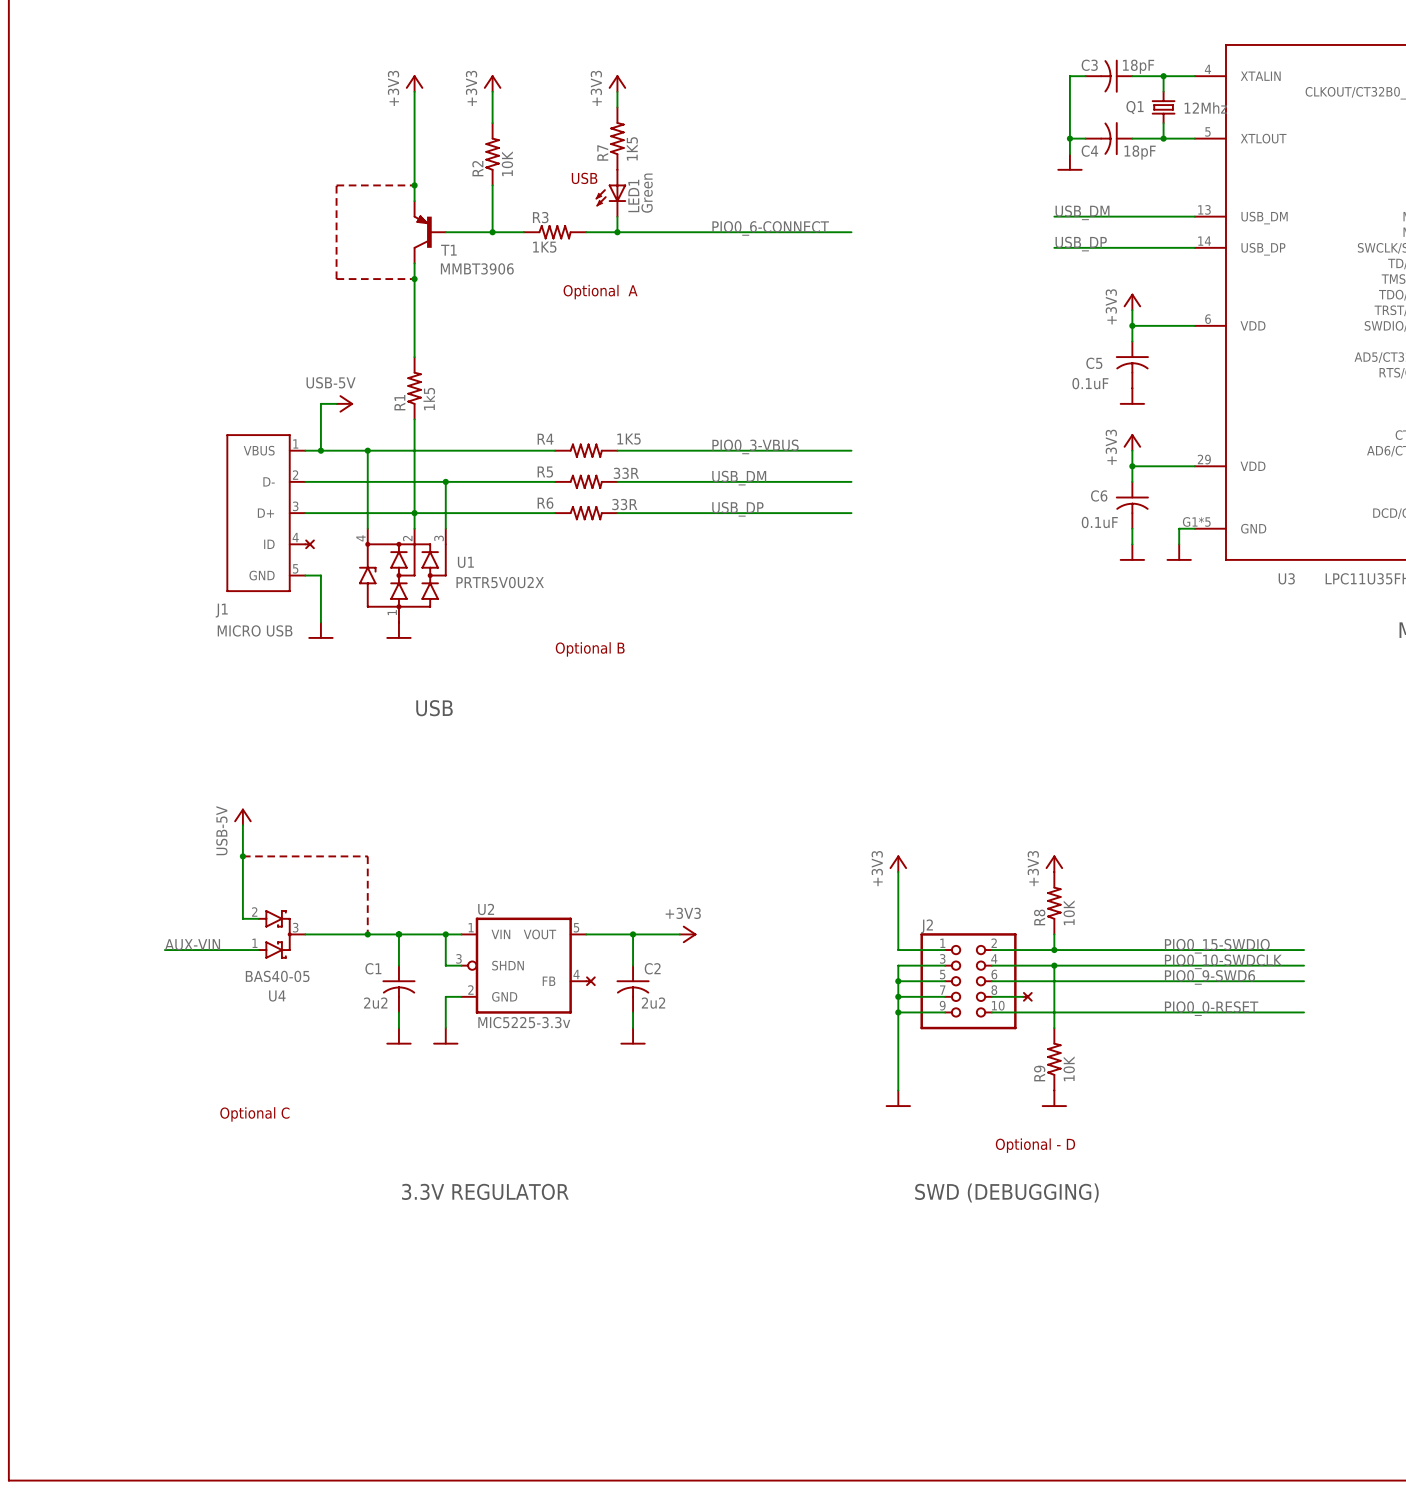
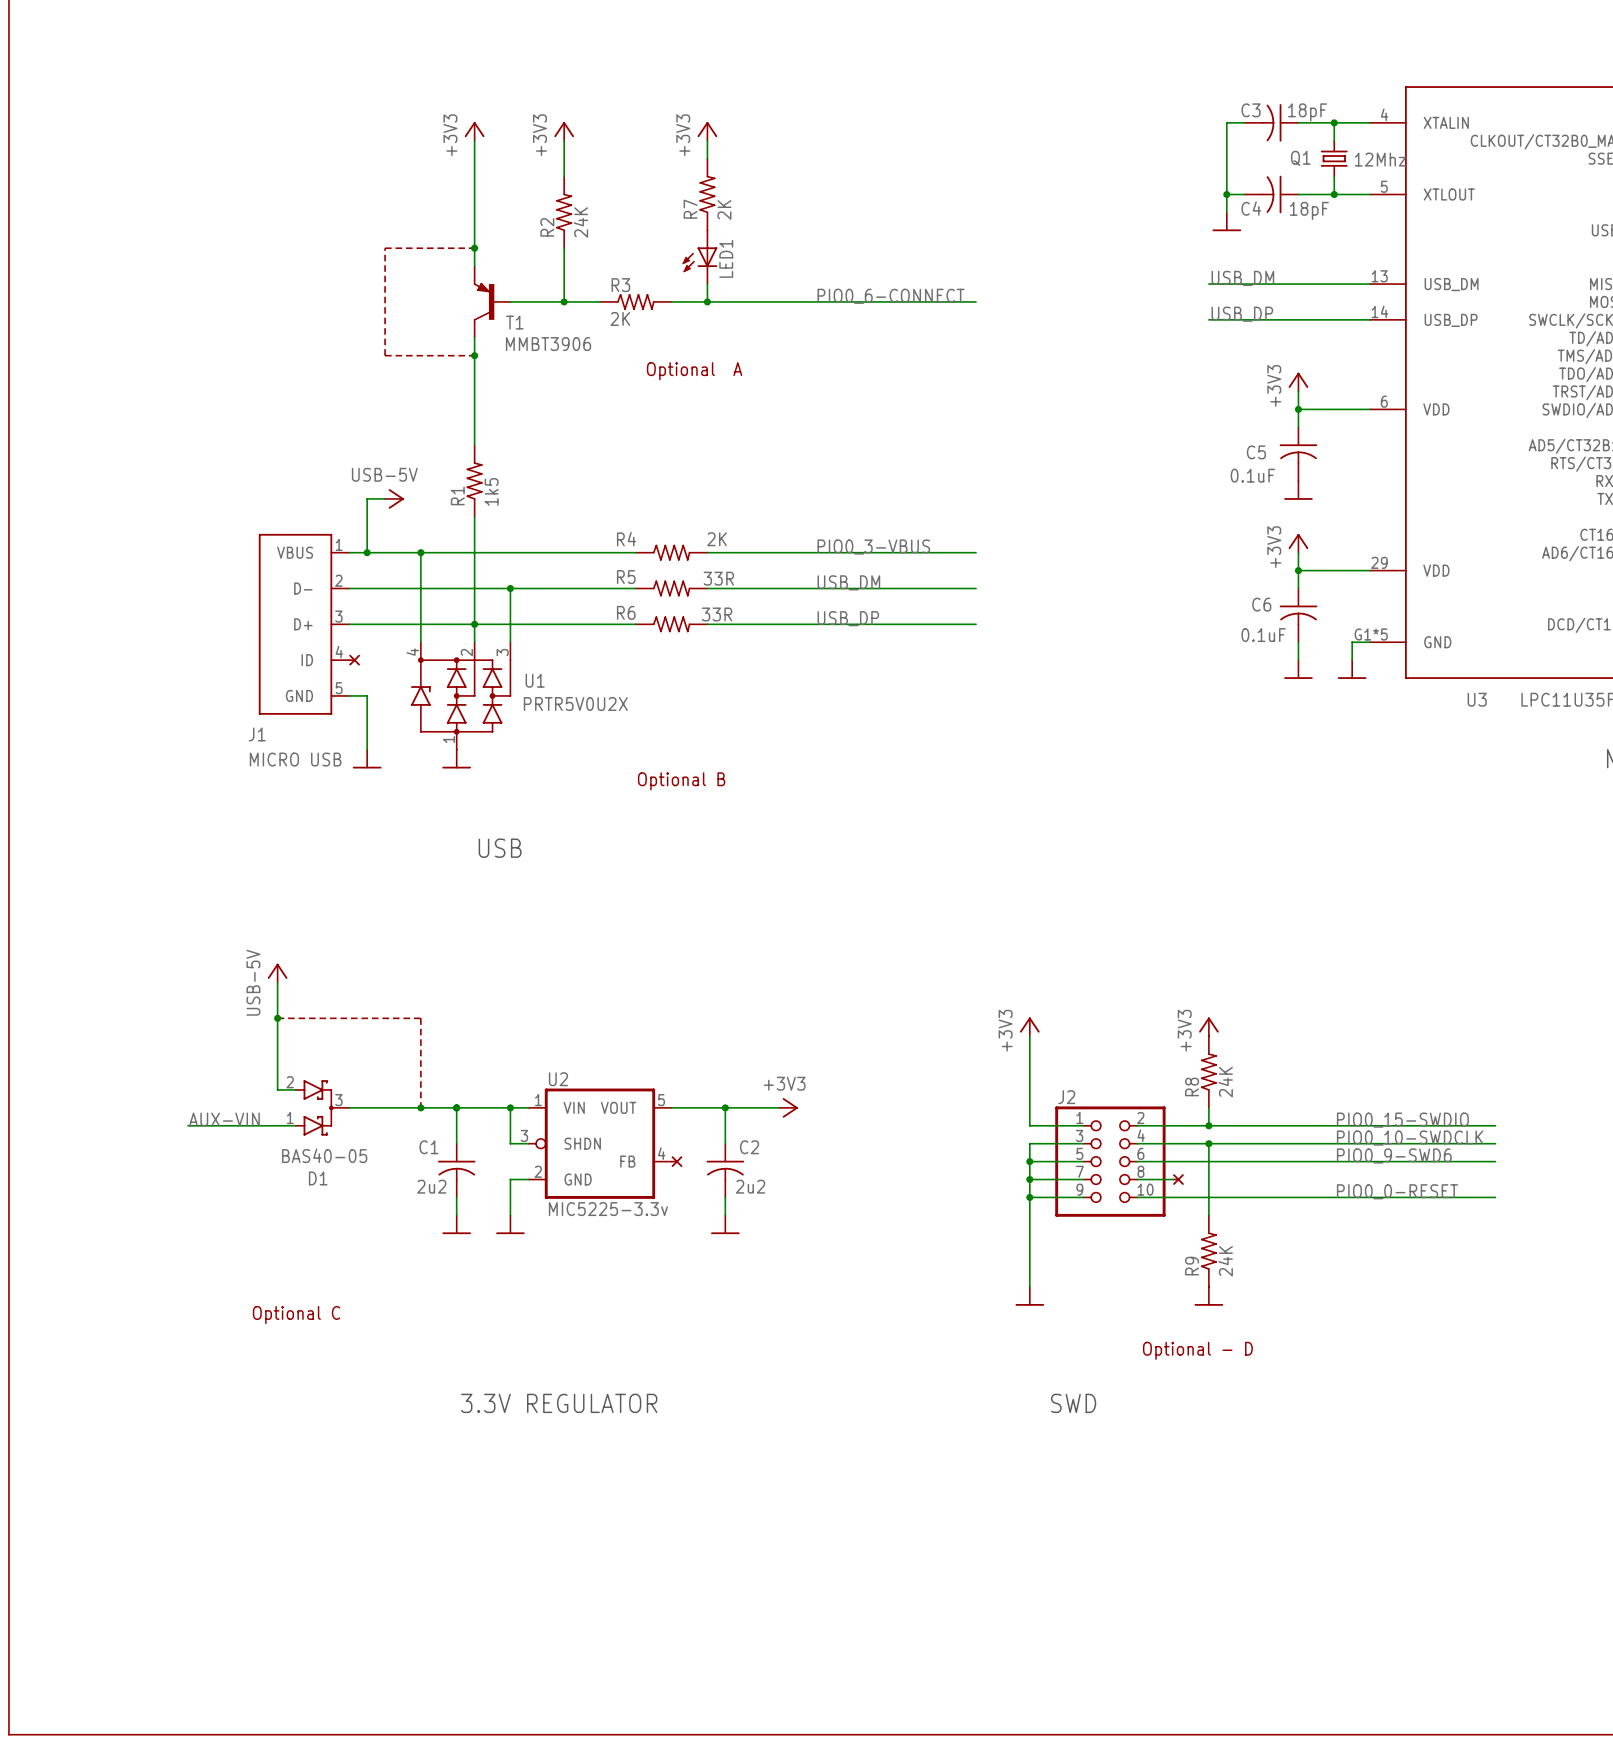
R7 value: 1K5 (632, 148) -> 2K (724, 209)
R2 value: 10K (507, 163) -> 24K (580, 222)
text: USB (584, 178) -> none
LED1 value: Green (647, 193) -> none
R3 value: 1K5 (544, 247) -> 2K (620, 318)
R4 value: 1K5 (629, 439) -> 2K (717, 539)
R8 value: 10K (1069, 912) -> 24K (1225, 1082)
U4 name: U4 (277, 996) -> D1 (318, 1178)
R9 value: 10K (1069, 1068) -> 24K (1225, 1261)
text: SWD (DEBUGGING) (1006, 1192) -> SWD (1073, 1403)

